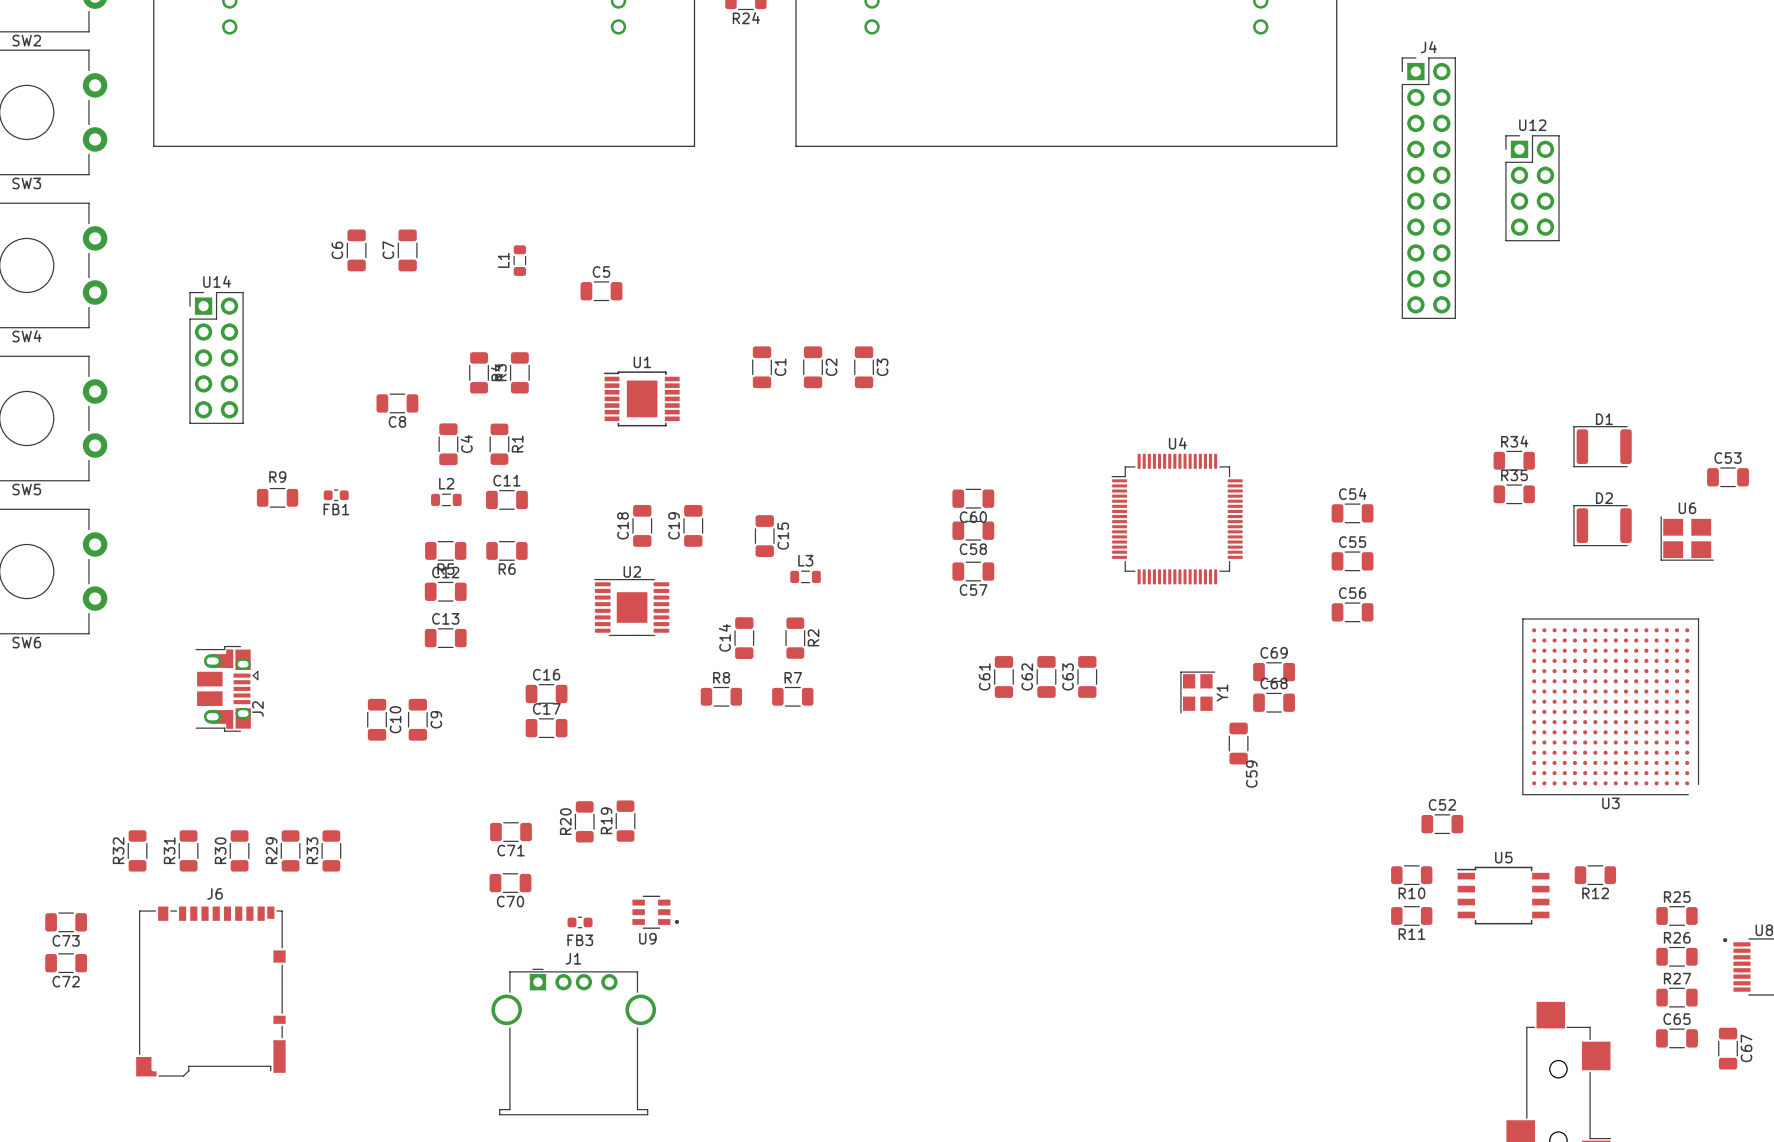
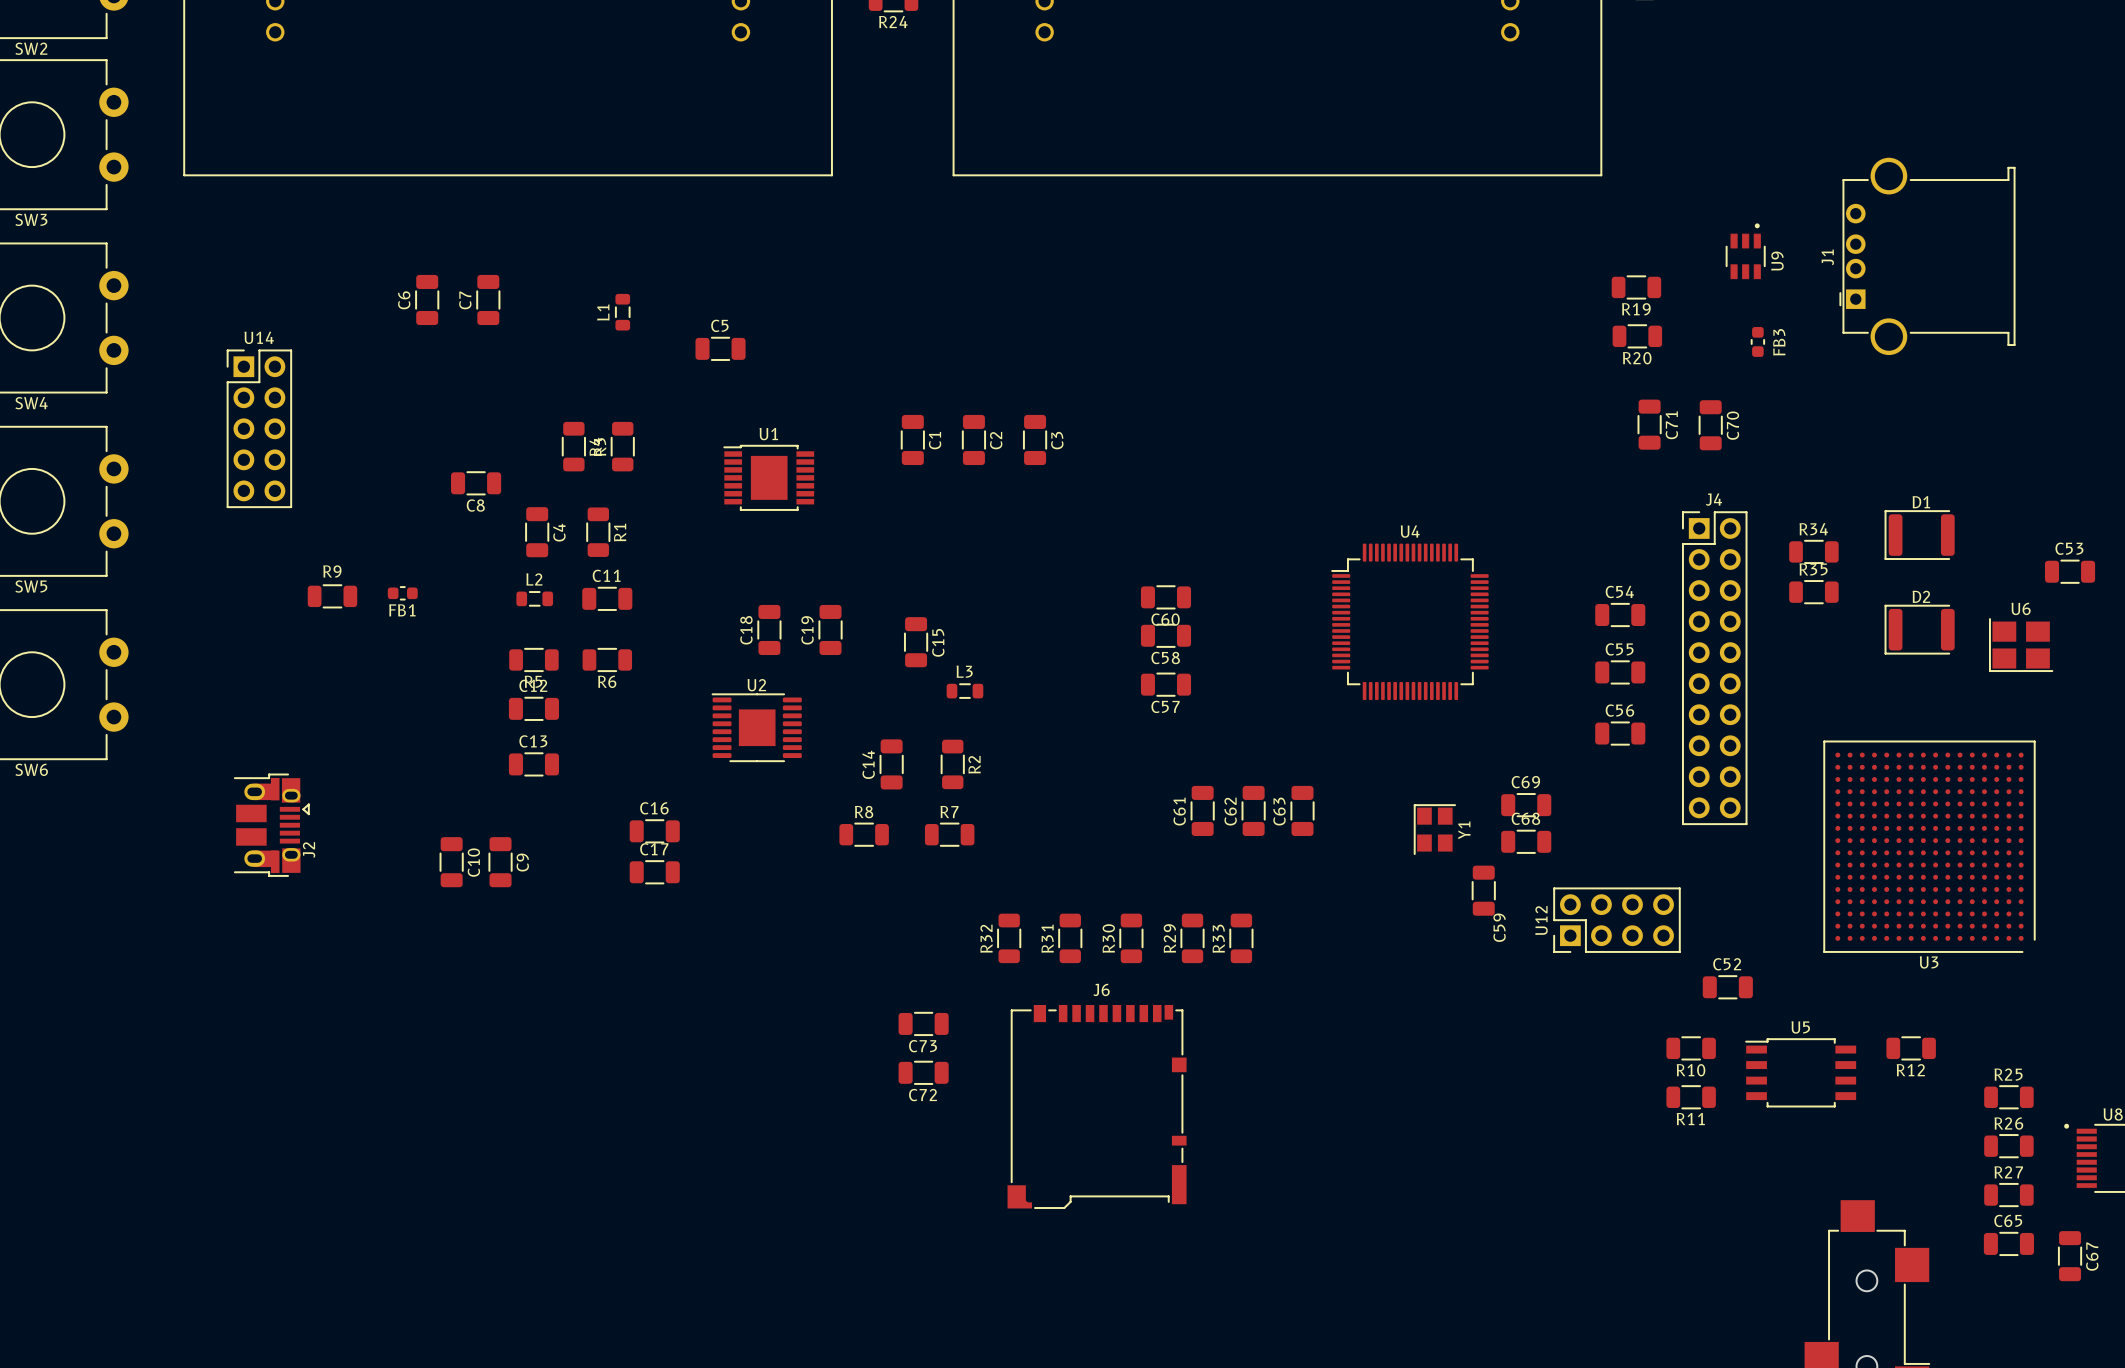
J4 position: (1428, 188) -> (1714, 668)
U12 rotation: 0° (1532, 188) -> 90° counterclockwise (1616, 920)
U12 position: (1532, 188) -> (1616, 920)
R19 name position: R19 (606, 820) -> R19 (1636, 309)
R20 name position: R20 (565, 821) -> R20 (1637, 358)
R20 rotation: 0° (584, 821) -> 90° clockwise (1637, 336)
R20 position: (584, 821) -> (1637, 336)
R19 rotation: 0° (625, 821) -> 90° clockwise (1636, 287)
R19 position: (625, 821) -> (1636, 287)
C71 rotation: 0° (511, 832) -> 90° clockwise (1649, 424)
C71 position: (511, 832) -> (1649, 424)
R32 position: (137, 850) -> (1009, 938)
R31 position: (188, 850) -> (1070, 938)
R30 position: (239, 850) -> (1131, 938)
R29 position: (290, 850) -> (1192, 938)
R33 position: (331, 850) -> (1241, 938)
C71 name position: C71 (511, 850) -> C71 (1671, 425)
C70 rotation: 0° (510, 883) -> 90° clockwise (1710, 425)
C70 position: (510, 883) -> (1710, 425)
C70 name position: C70 (510, 901) -> C70 (1732, 425)
U9 rotation: 0° (655, 912) -> 90° counterclockwise (1745, 251)
U9 position: (655, 912) -> (1745, 251)
C73 position: (66, 922) -> (923, 1023)
FB3 rotation: 0° (580, 922) -> 90° clockwise (1757, 341)
FB3 position: (580, 922) -> (1757, 341)
FB3 name position: FB3 (580, 940) -> FB3 (1779, 342)
C72 position: (66, 963) -> (923, 1072)
J6 position: (210, 991) -> (1097, 1106)
J1 rotation: 0° (573, 1042) -> 90° counterclockwise (1927, 256)
J1 position: (573, 1042) -> (1927, 256)

